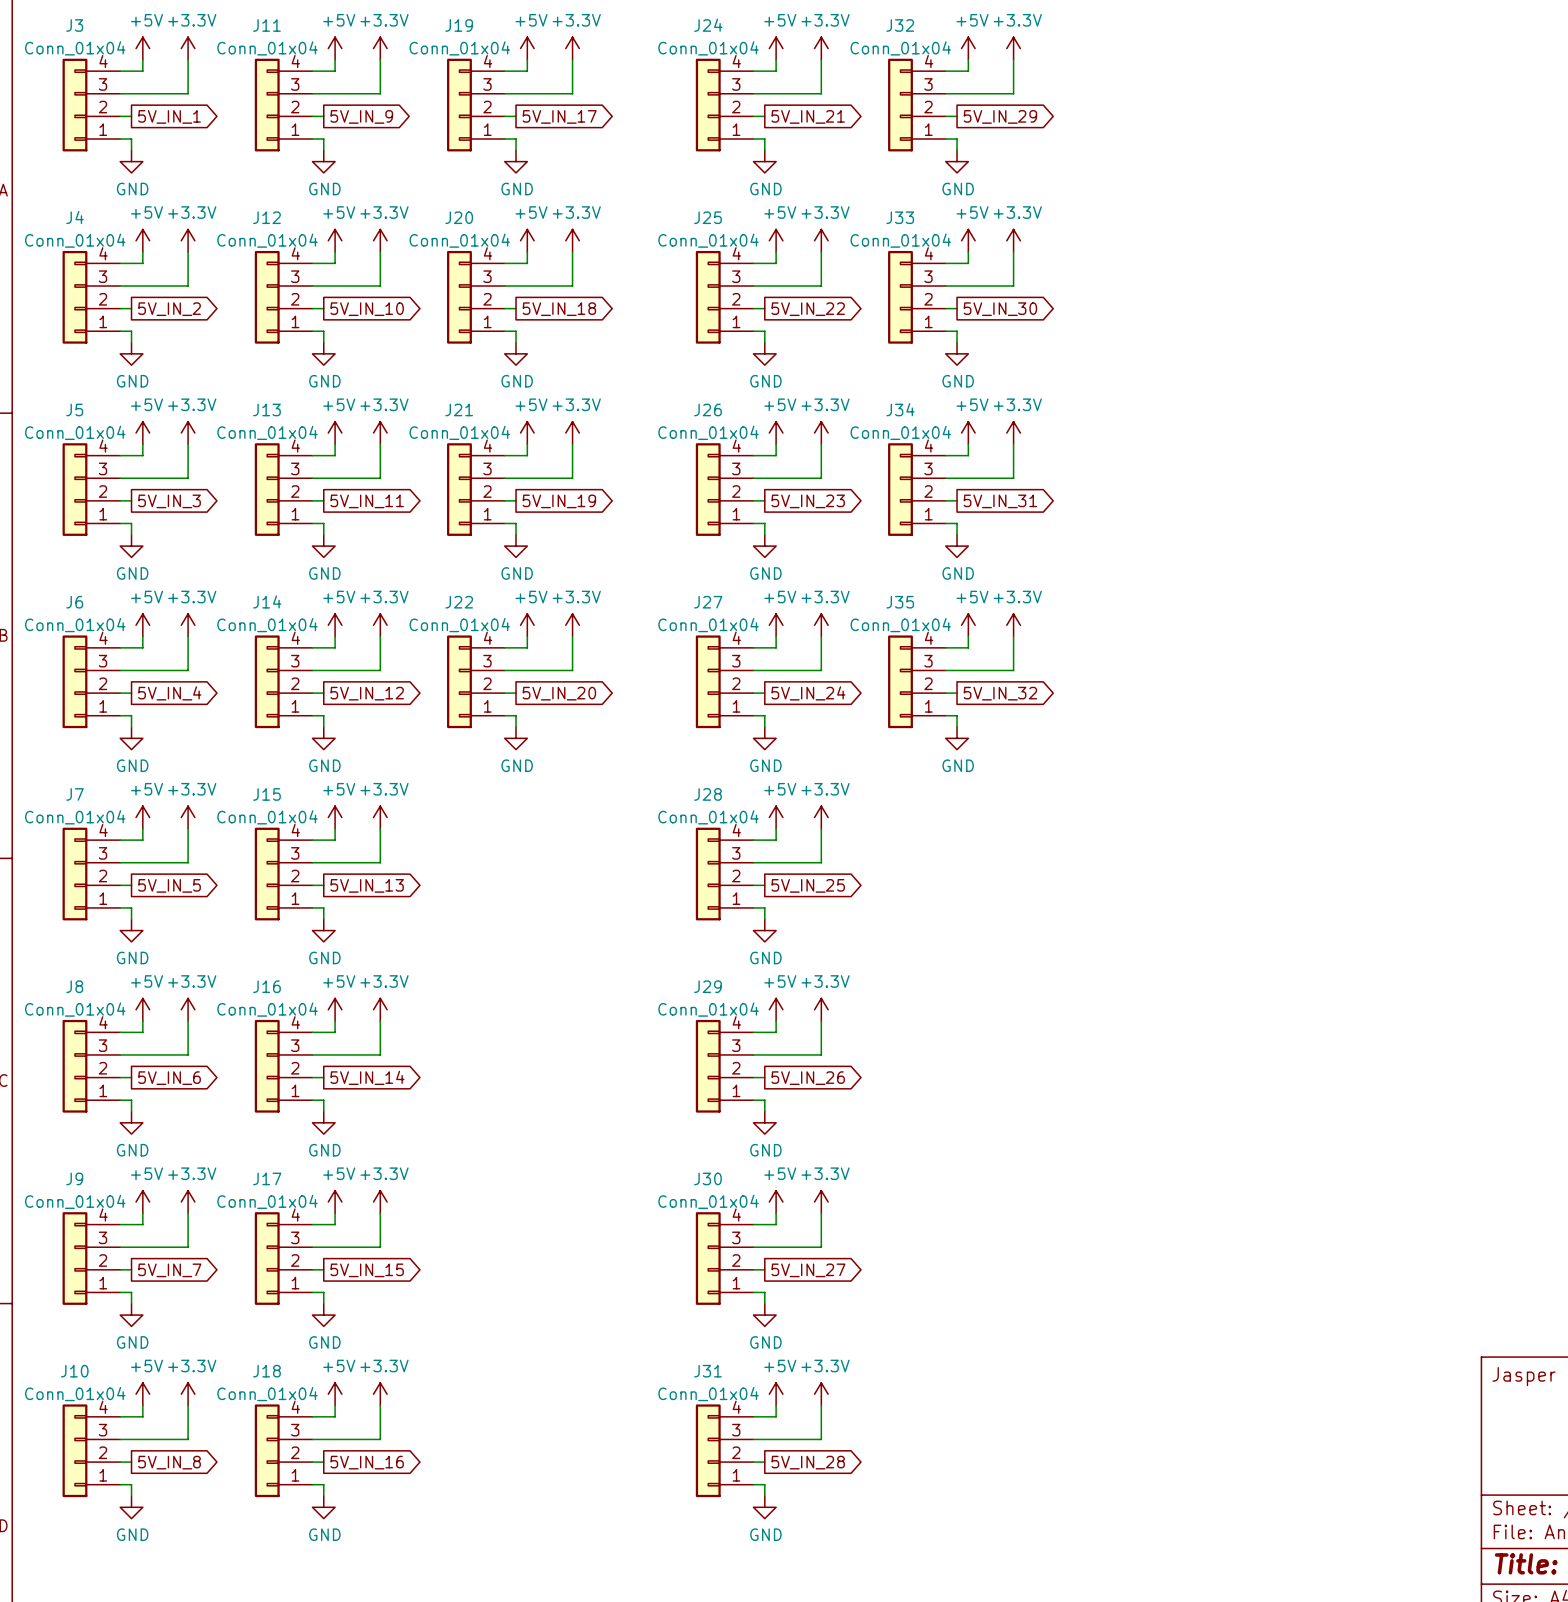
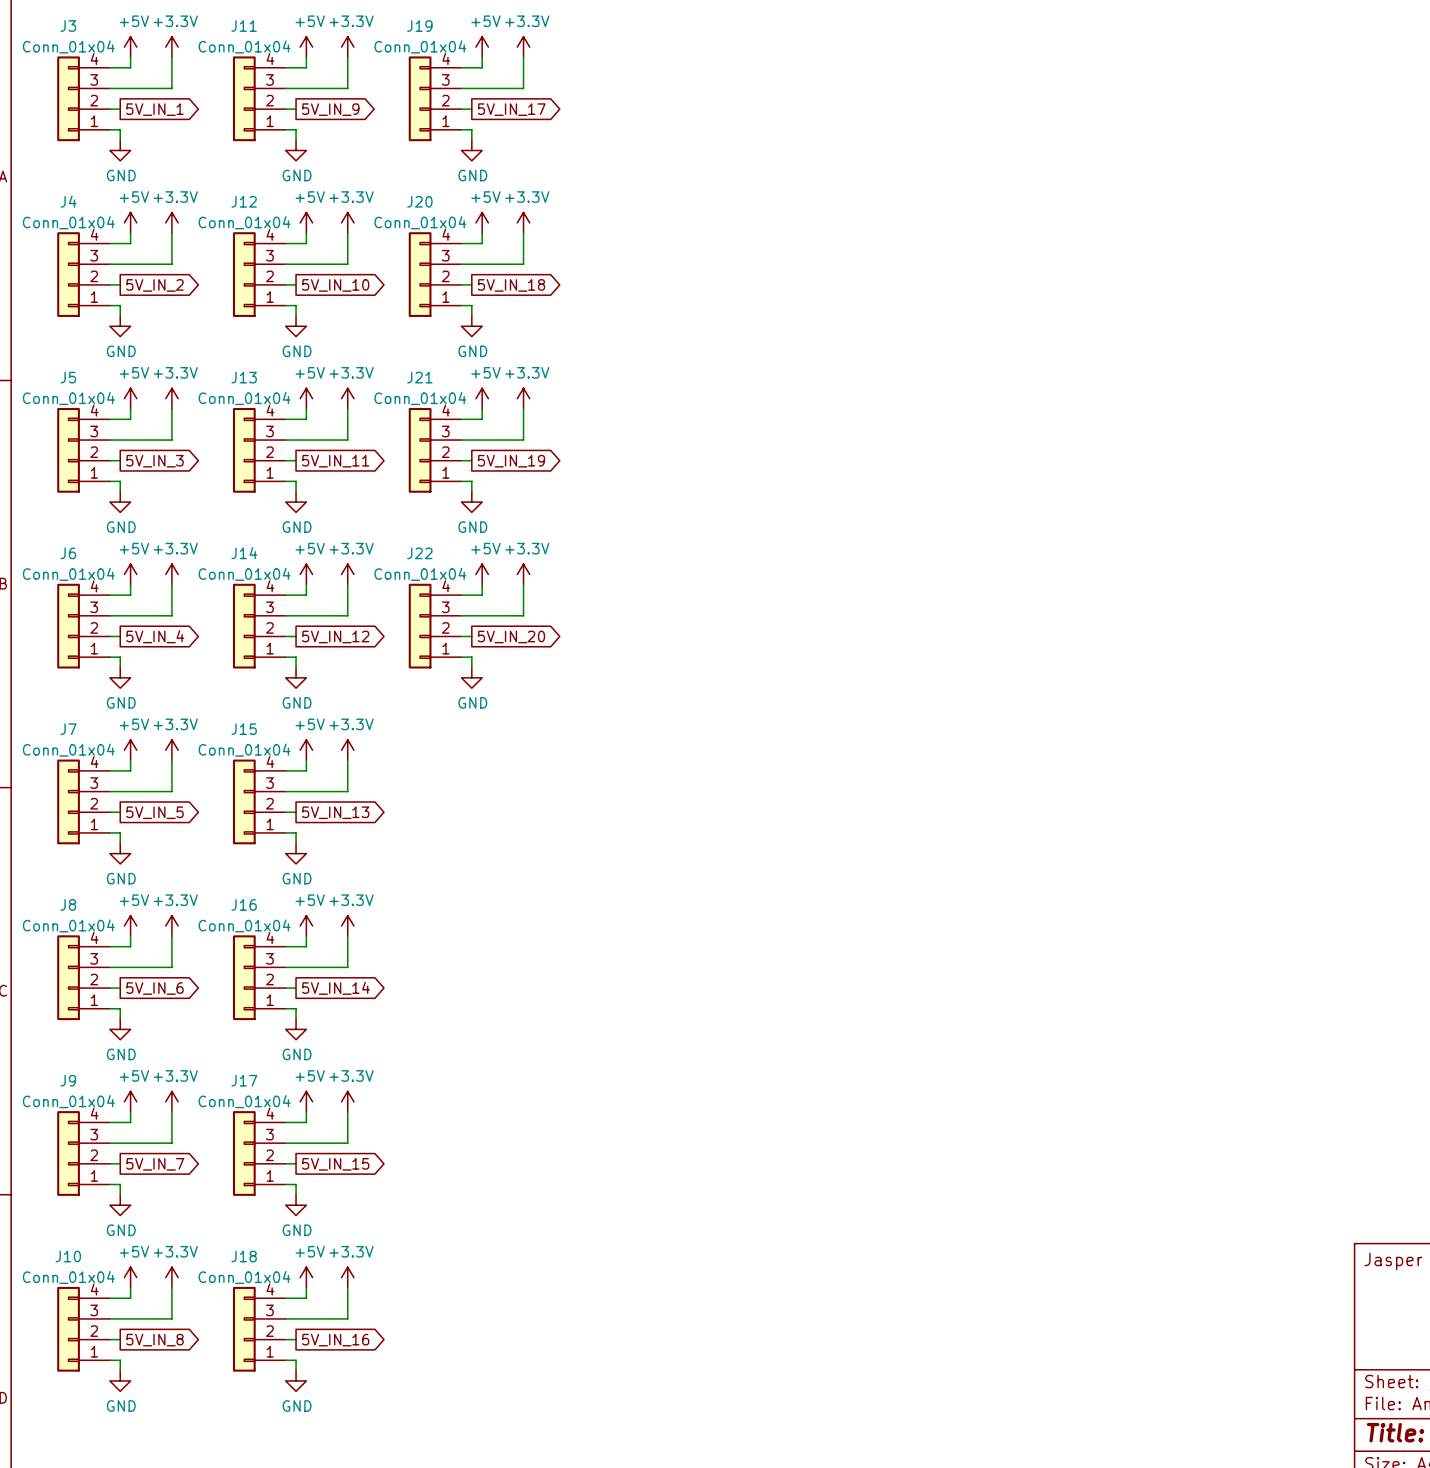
power symbol: +5V (776, 48) -> none
power symbol: +3.3V (821, 48) -> none
power symbol: +5V (968, 48) -> none
power symbol: +3.3V (1013, 48) -> none
wire: (776, 59) (776, 71) (753, 71) -> none
wire: (821, 59) (821, 93) (753, 93) -> none
wire: (968, 59) (968, 71) (945, 71) -> none
wire: (1013, 59) (1013, 93) (945, 93) -> none
J24: Conn_01x04 (724, 105) -> none
J32: Conn_01x04 (916, 105) -> none
wire: (753, 116) (764, 116) -> none
global label: 5V_IN_21 (808, 116) -> none
wire: (945, 116) (957, 116) -> none
global label: 5V_IN_29 (1000, 116) -> none
wire: (753, 139) (764, 139) (764, 150) -> none
wire: (945, 139) (957, 139) (957, 150) -> none
power symbol: GND (764, 161) -> none
power symbol: GND (957, 161) -> none
power symbol: +5V (776, 240) -> none
power symbol: +3.3V (821, 240) -> none
power symbol: +5V (968, 240) -> none
power symbol: +3.3V (1013, 240) -> none
wire: (776, 252) (776, 263) (753, 263) -> none
wire: (821, 252) (821, 286) (753, 286) -> none
wire: (968, 252) (968, 263) (945, 263) -> none
wire: (1013, 252) (1013, 286) (945, 286) -> none
J25: Conn_01x04 (724, 297) -> none
J33: Conn_01x04 (916, 297) -> none
wire: (753, 308) (764, 308) -> none
wire: (945, 308) (957, 308) -> none
global label: 5V_IN_22 (808, 309) -> none
global label: 5V_IN_30 (1000, 309) -> none
wire: (753, 331) (764, 331) (764, 342) -> none
wire: (945, 331) (957, 331) (957, 342) -> none
power symbol: GND (764, 353) -> none
power symbol: GND (957, 353) -> none
power symbol: +5V (776, 433) -> none
power symbol: +3.3V (821, 433) -> none
power symbol: +5V (968, 433) -> none
power symbol: +3.3V (1013, 433) -> none
wire: (776, 444) (776, 455) (753, 455) -> none
wire: (821, 444) (821, 478) (753, 478) -> none
wire: (968, 444) (968, 455) (945, 455) -> none
wire: (1013, 444) (1013, 478) (945, 478) -> none
J26: Conn_01x04 (724, 489) -> none
J34: Conn_01x04 (916, 489) -> none
wire: (753, 500) (764, 500) -> none
wire: (945, 500) (957, 500) -> none
global label: 5V_IN_23 (808, 501) -> none
global label: 5V_IN_31 (1000, 501) -> none
wire: (753, 523) (764, 523) (764, 534) -> none
wire: (945, 523) (957, 523) (957, 534) -> none
power symbol: GND (764, 546) -> none
power symbol: GND (957, 546) -> none
power symbol: +5V (776, 625) -> none
power symbol: +3.3V (821, 625) -> none
power symbol: +5V (968, 625) -> none
power symbol: +3.3V (1013, 625) -> none
wire: (776, 636) (776, 647) (753, 647) -> none
wire: (821, 636) (821, 670) (753, 670) -> none
wire: (968, 636) (968, 647) (945, 647) -> none
wire: (1013, 636) (1013, 670) (945, 670) -> none
J27: Conn_01x04 (724, 681) -> none
J35: Conn_01x04 (916, 681) -> none
wire: (753, 693) (764, 693) -> none
global label: 5V_IN_24 (808, 693) -> none
wire: (945, 693) (957, 693) -> none
global label: 5V_IN_32 (1000, 693) -> none
wire: (753, 715) (764, 715) (764, 727) -> none
wire: (945, 715) (957, 715) (957, 727) -> none
power symbol: GND (764, 738) -> none
power symbol: GND (957, 738) -> none
power symbol: +5V (776, 817) -> none
power symbol: +3.3V (821, 817) -> none
wire: (776, 828) (776, 840) (753, 840) -> none
wire: (821, 828) (821, 862) (753, 862) -> none
J28: Conn_01x04 (724, 874) -> none
wire: (753, 885) (764, 885) -> none
global label: 5V_IN_25 (808, 885) -> none
wire: (753, 907) (764, 907) (764, 919) -> none
power symbol: GND (764, 930) -> none
power symbol: +5V (776, 1009) -> none
power symbol: +3.3V (821, 1009) -> none
wire: (776, 1021) (776, 1032) (753, 1032) -> none
wire: (821, 1021) (821, 1054) (753, 1054) -> none
J29: Conn_01x04 (724, 1066) -> none
wire: (753, 1077) (764, 1077) -> none
global label: 5V_IN_26 (808, 1078) -> none
wire: (753, 1100) (764, 1100) (764, 1111) -> none
power symbol: GND (764, 1122) -> none
power symbol: +5V (776, 1201) -> none
power symbol: +3.3V (821, 1201) -> none
wire: (776, 1213) (776, 1224) (753, 1224) -> none
wire: (821, 1213) (821, 1247) (753, 1247) -> none
J30: Conn_01x04 (724, 1258) -> none
wire: (753, 1269) (764, 1269) -> none
global label: 5V_IN_27 (808, 1270) -> none
wire: (753, 1292) (764, 1292) (764, 1303) -> none
power symbol: GND (764, 1315) -> none
power symbol: +5V (776, 1394) -> none
power symbol: +3.3V (821, 1394) -> none
wire: (776, 1405) (776, 1416) (753, 1416) -> none
wire: (821, 1405) (821, 1439) (753, 1439) -> none
J31: Conn_01x04 (724, 1450) -> none
wire: (753, 1462) (764, 1462) -> none
global label: 5V_IN_28 (808, 1462) -> none
wire: (753, 1484) (764, 1484) (764, 1495) -> none
power symbol: GND (764, 1507) -> none

